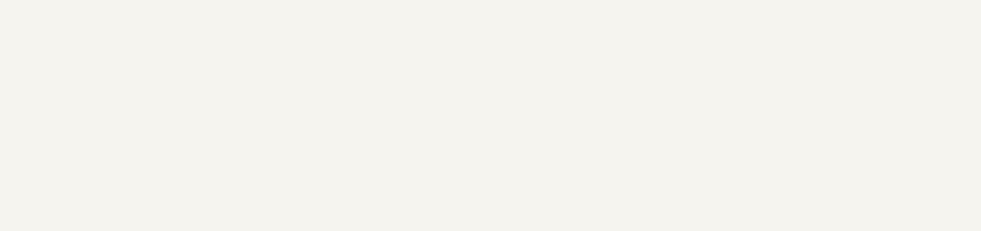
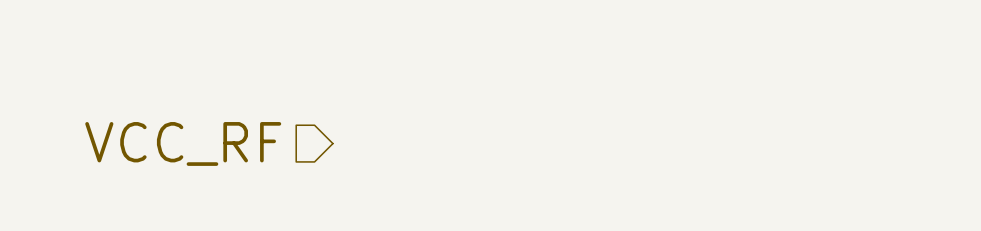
hierarchical label: none -> VCC_RF (183, 143)

